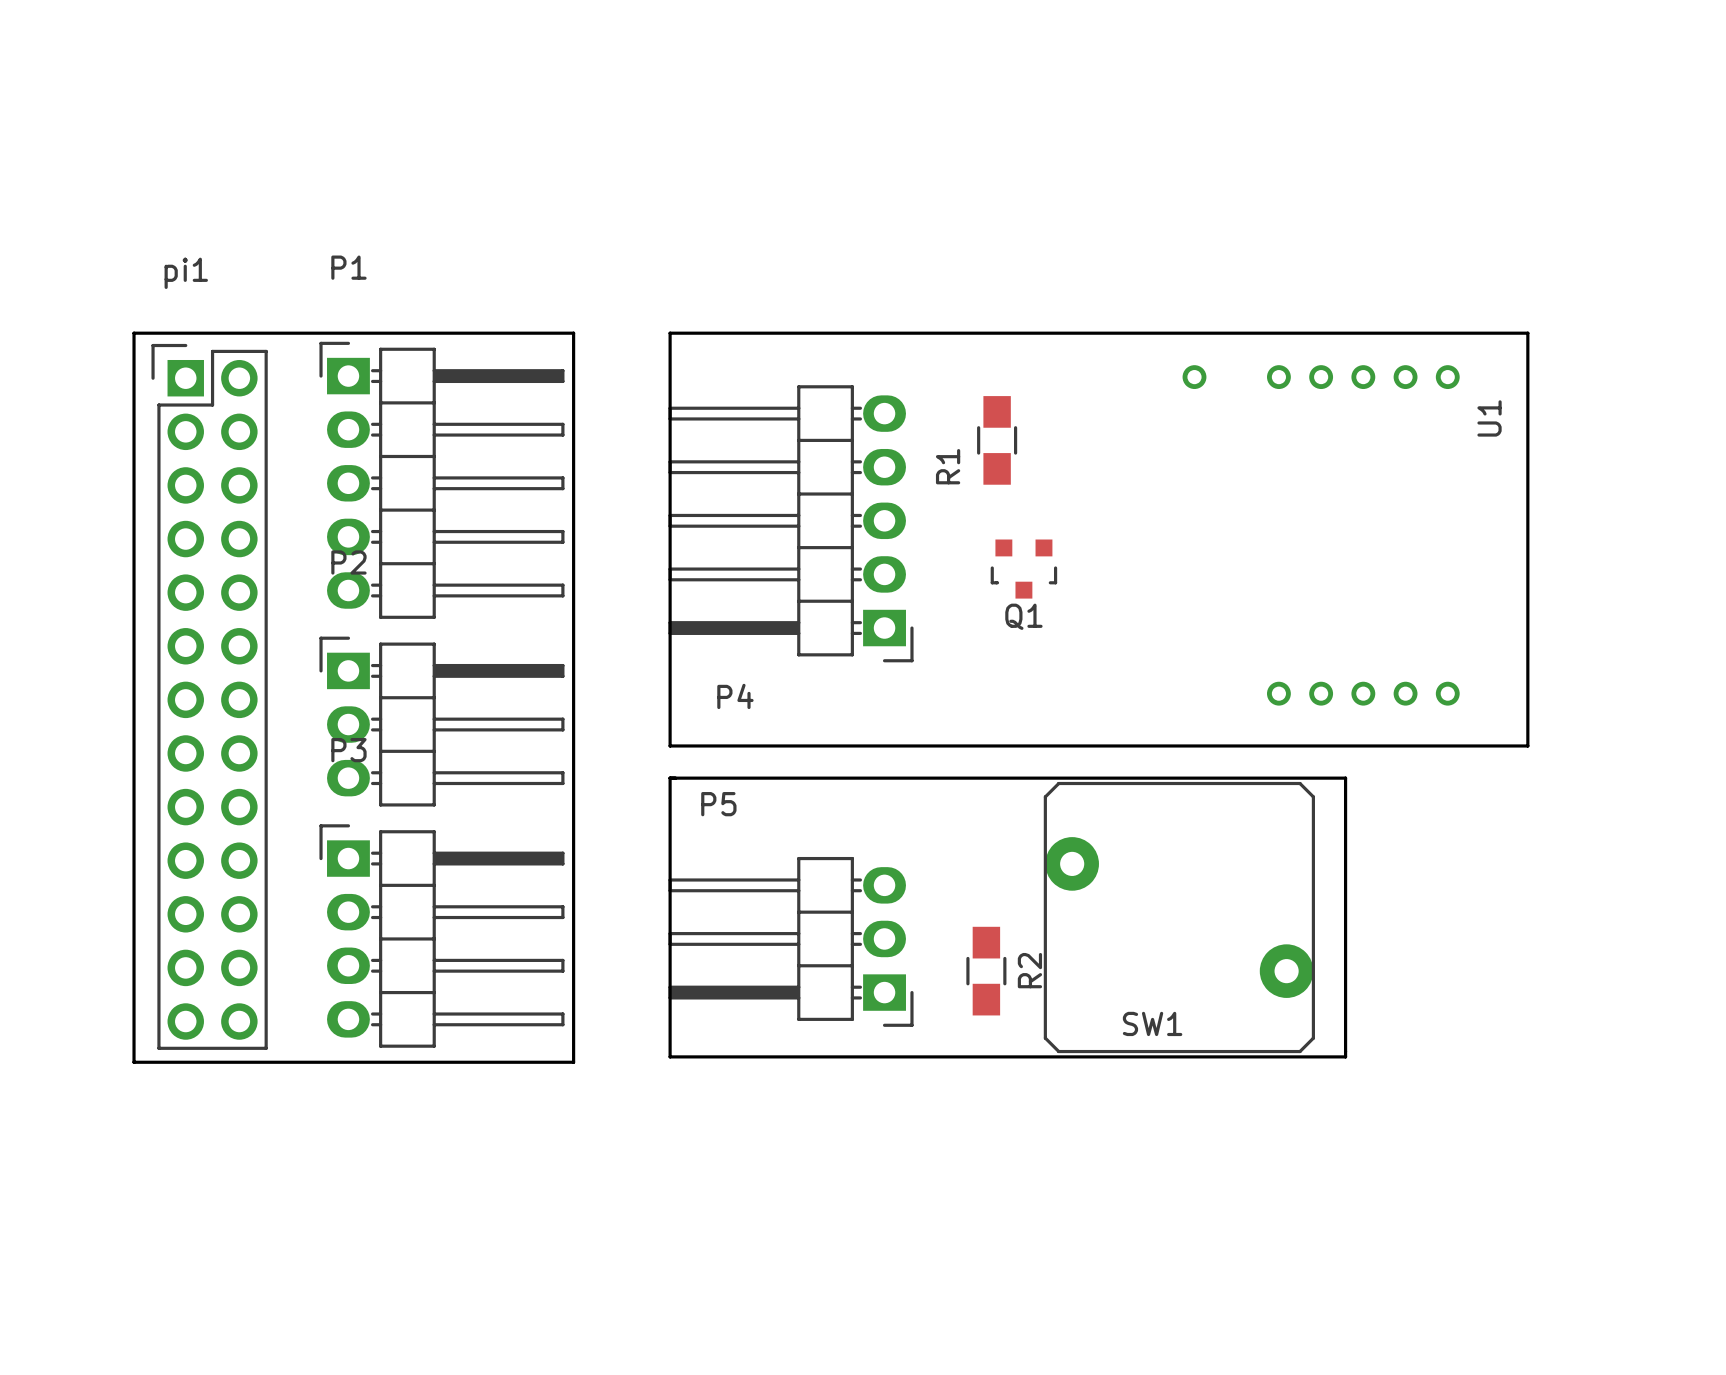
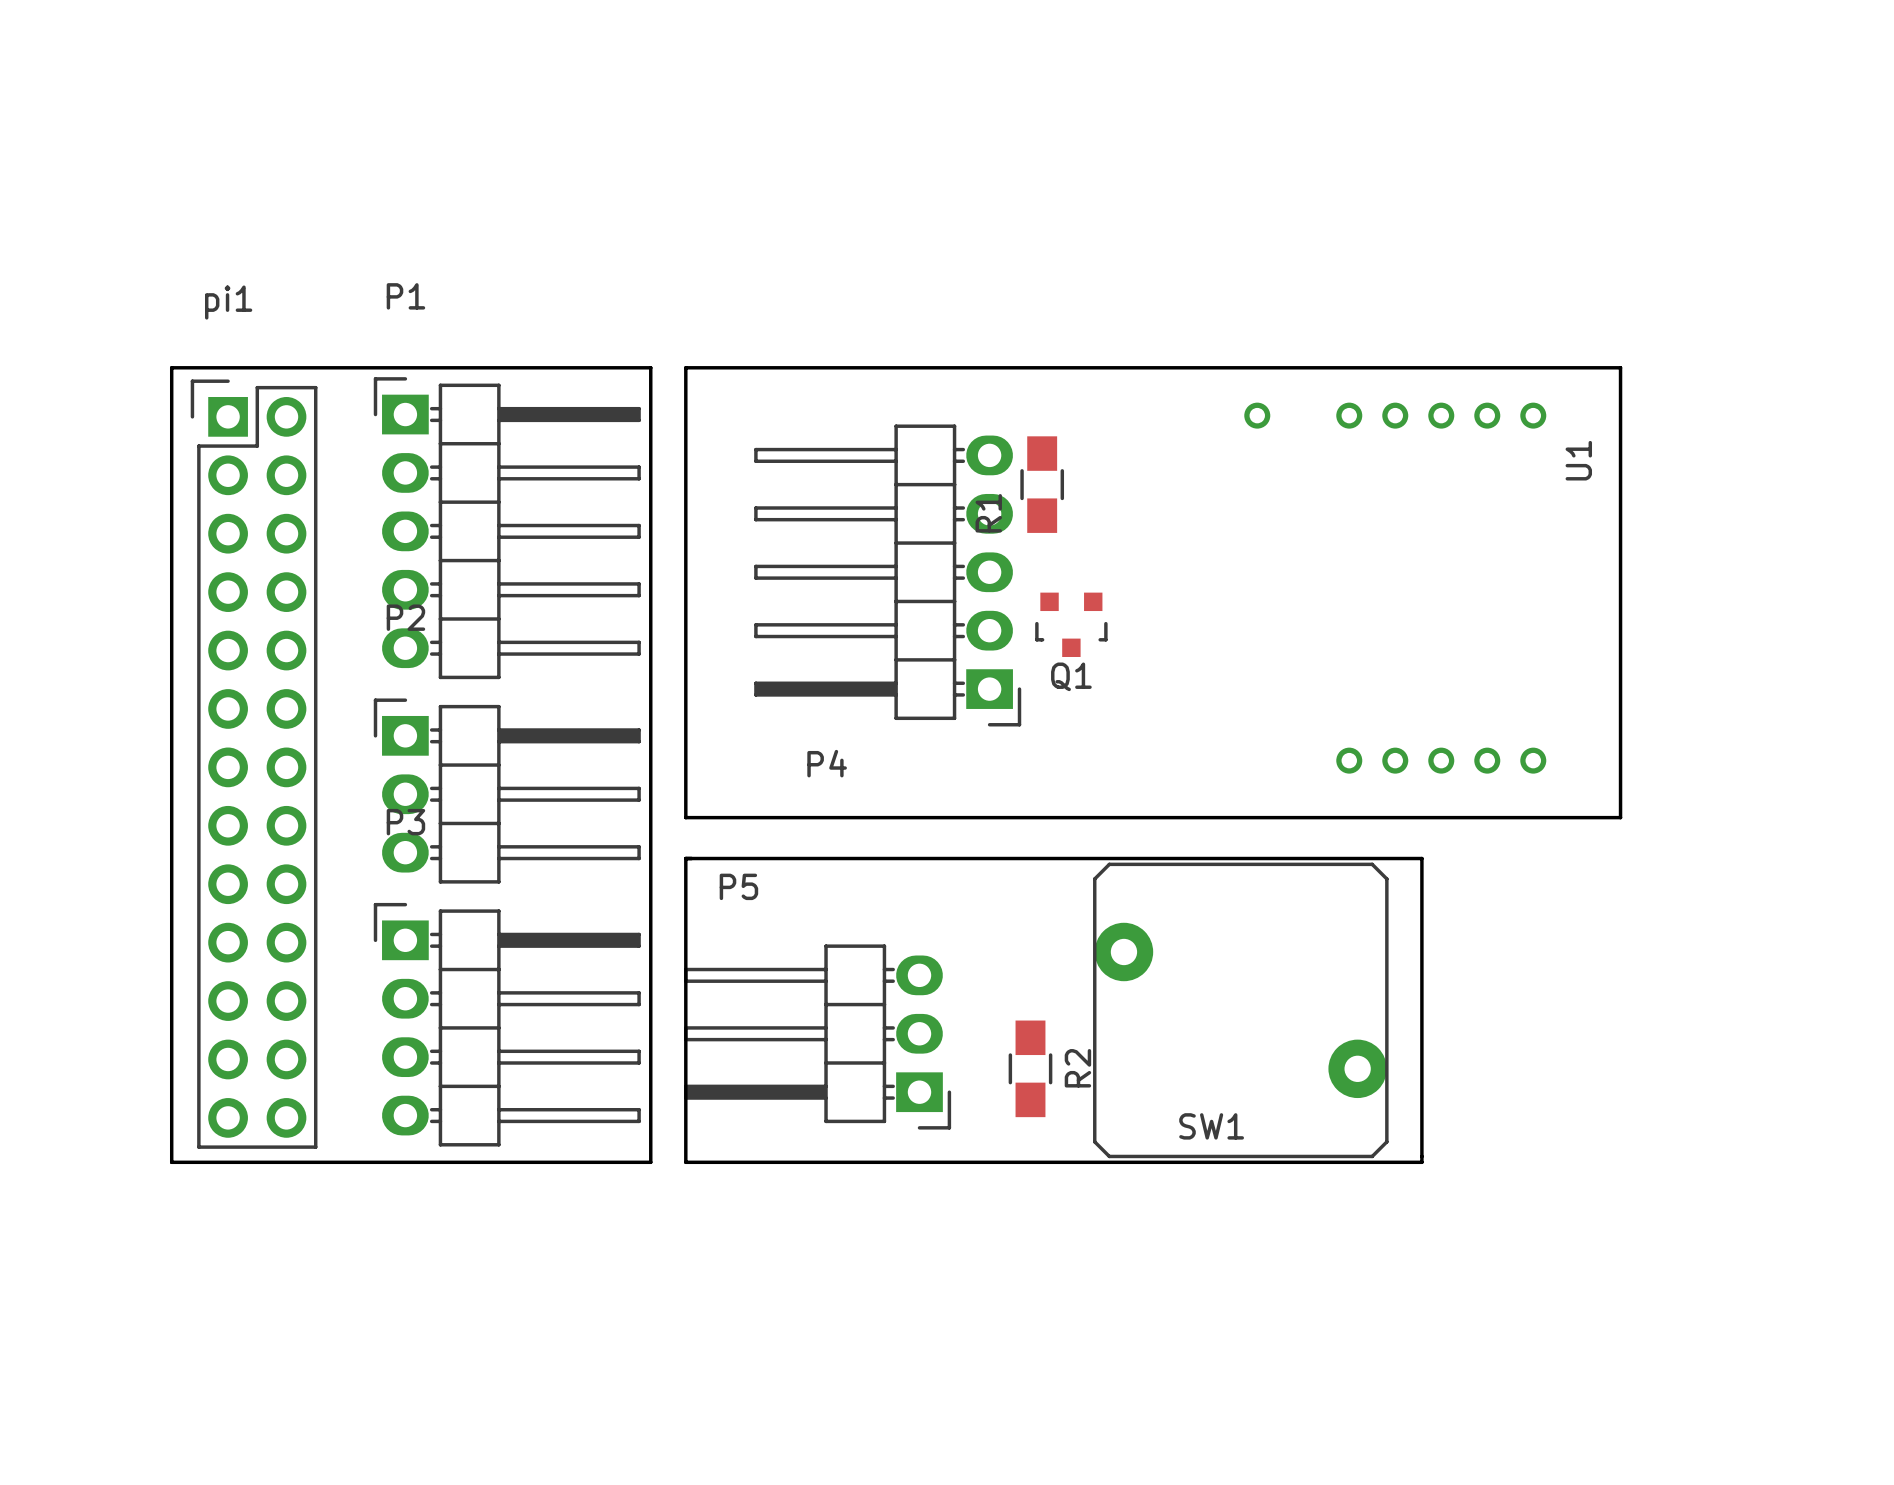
board edge: (670, 333) (670, 745) -> (755, 367) (685, 367) (685, 817) (755, 817)
board edge: (1463, 333) (1527, 333) (1527, 745) (1463, 745) -> (1620, 367) (1620, 817)
R1 position: (997, 440) -> (1042, 484)
U1 position: (1321, 535) -> (1395, 588)
Q1 position: (1023, 569) -> (1071, 624)
board edge: (670, 778) (1345, 778) (1345, 1056) (670, 1056) (670, 778) -> (685, 858) (685, 1162) (1421, 1162) (1421, 858) (685, 858)
SW1 position: (1179, 917) -> (1240, 1010)
P5 position: (791, 941) -> (817, 1037)
R2 position: (986, 971) -> (1030, 1068)

